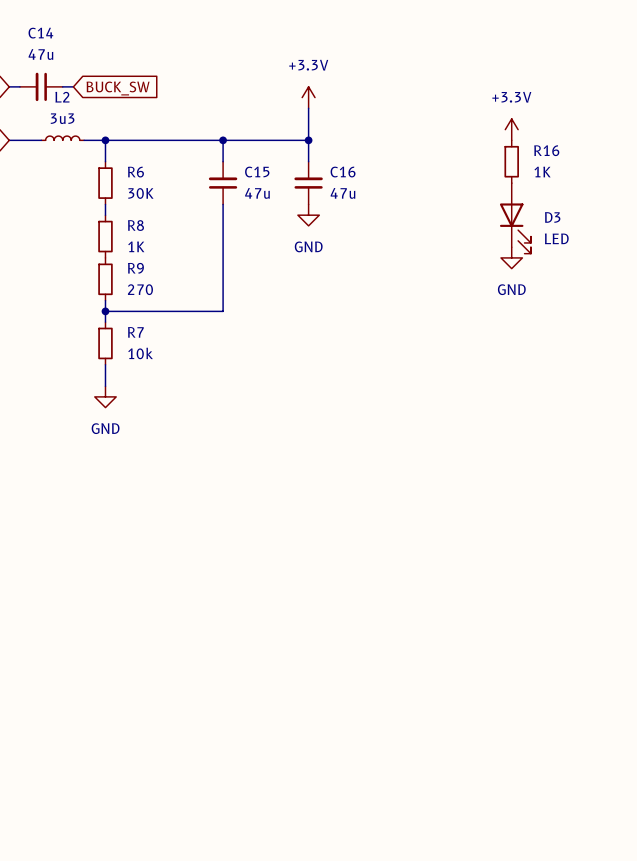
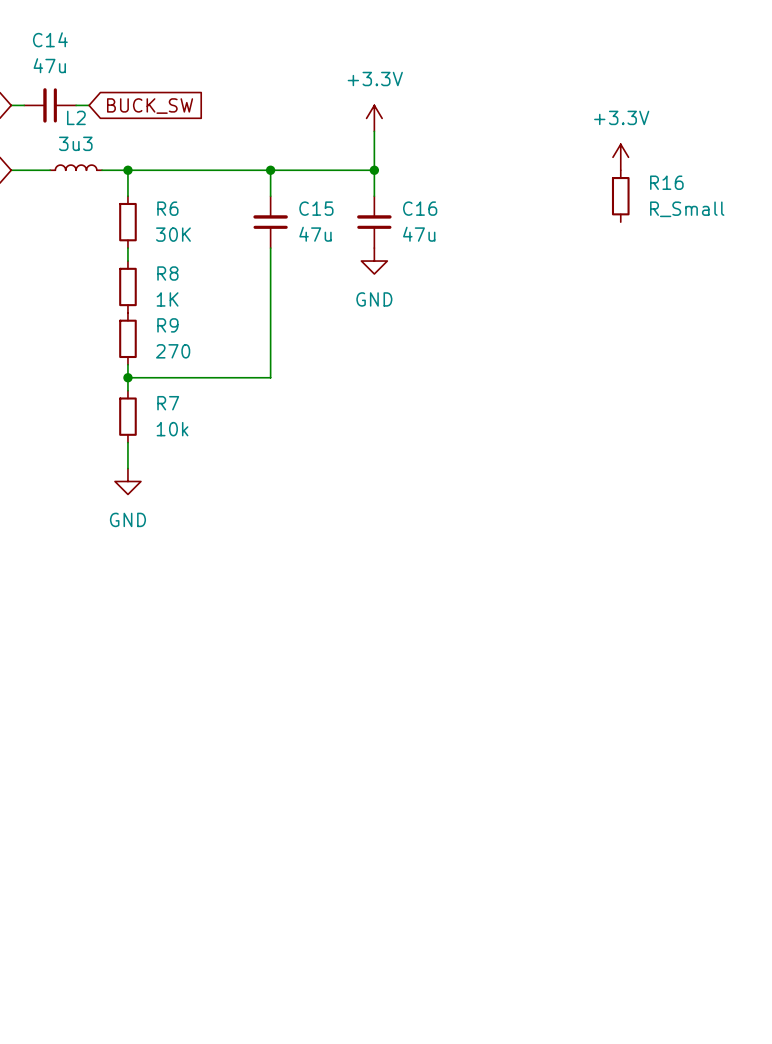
R16 value: 1K (542, 172) -> R_Small (687, 209)
D3: LED (515, 218) -> none
power symbol: GND (511, 257) -> none

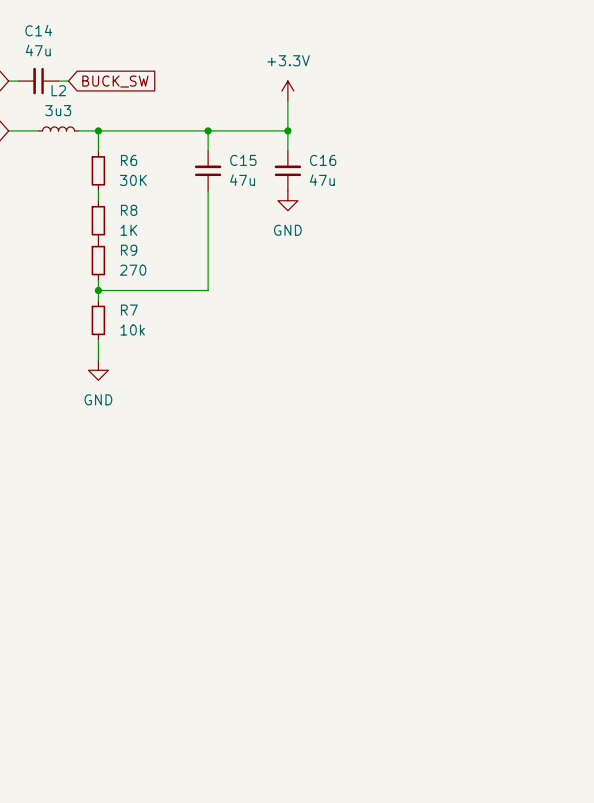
power symbol: +3.3V (620, 157) -> none
R16: R_Small (620, 196) -> none

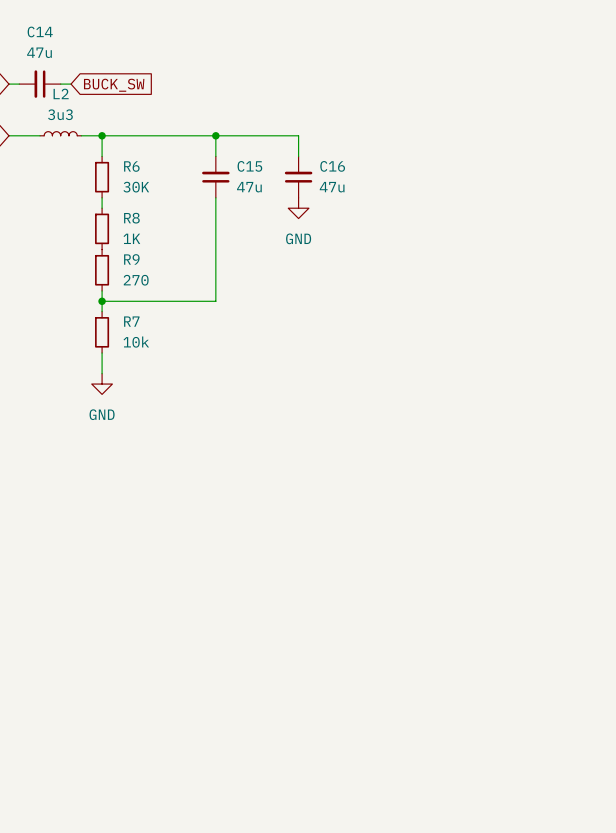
power symbol: +3.3V (287, 91) -> none
wire: (287, 101) (287, 130) -> none
junction: (287, 130) -> none

